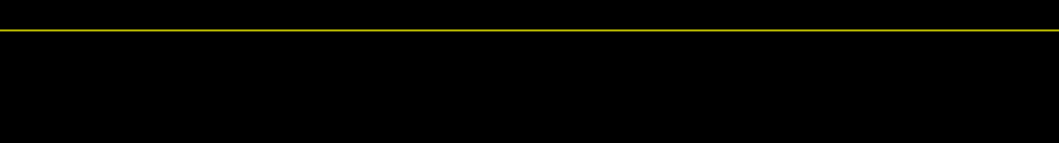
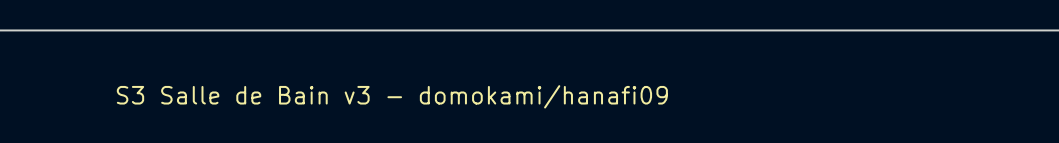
text: none -> S3 Salle de Bain v3 - domokami/hanafi09 (392, 96)

